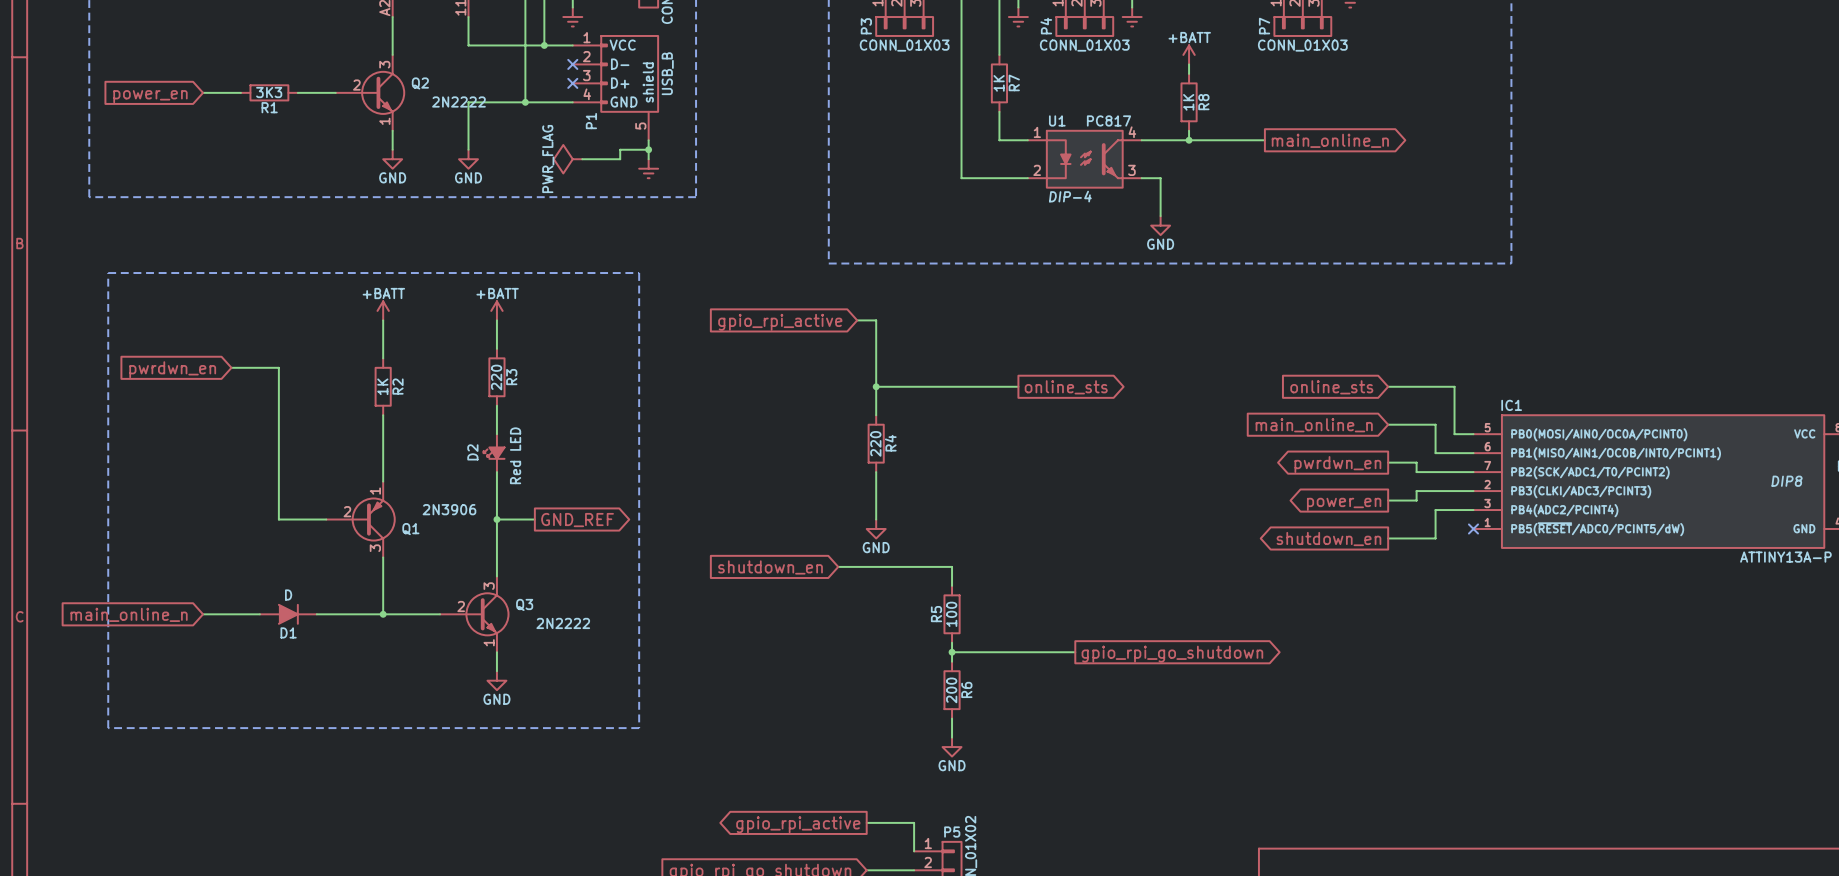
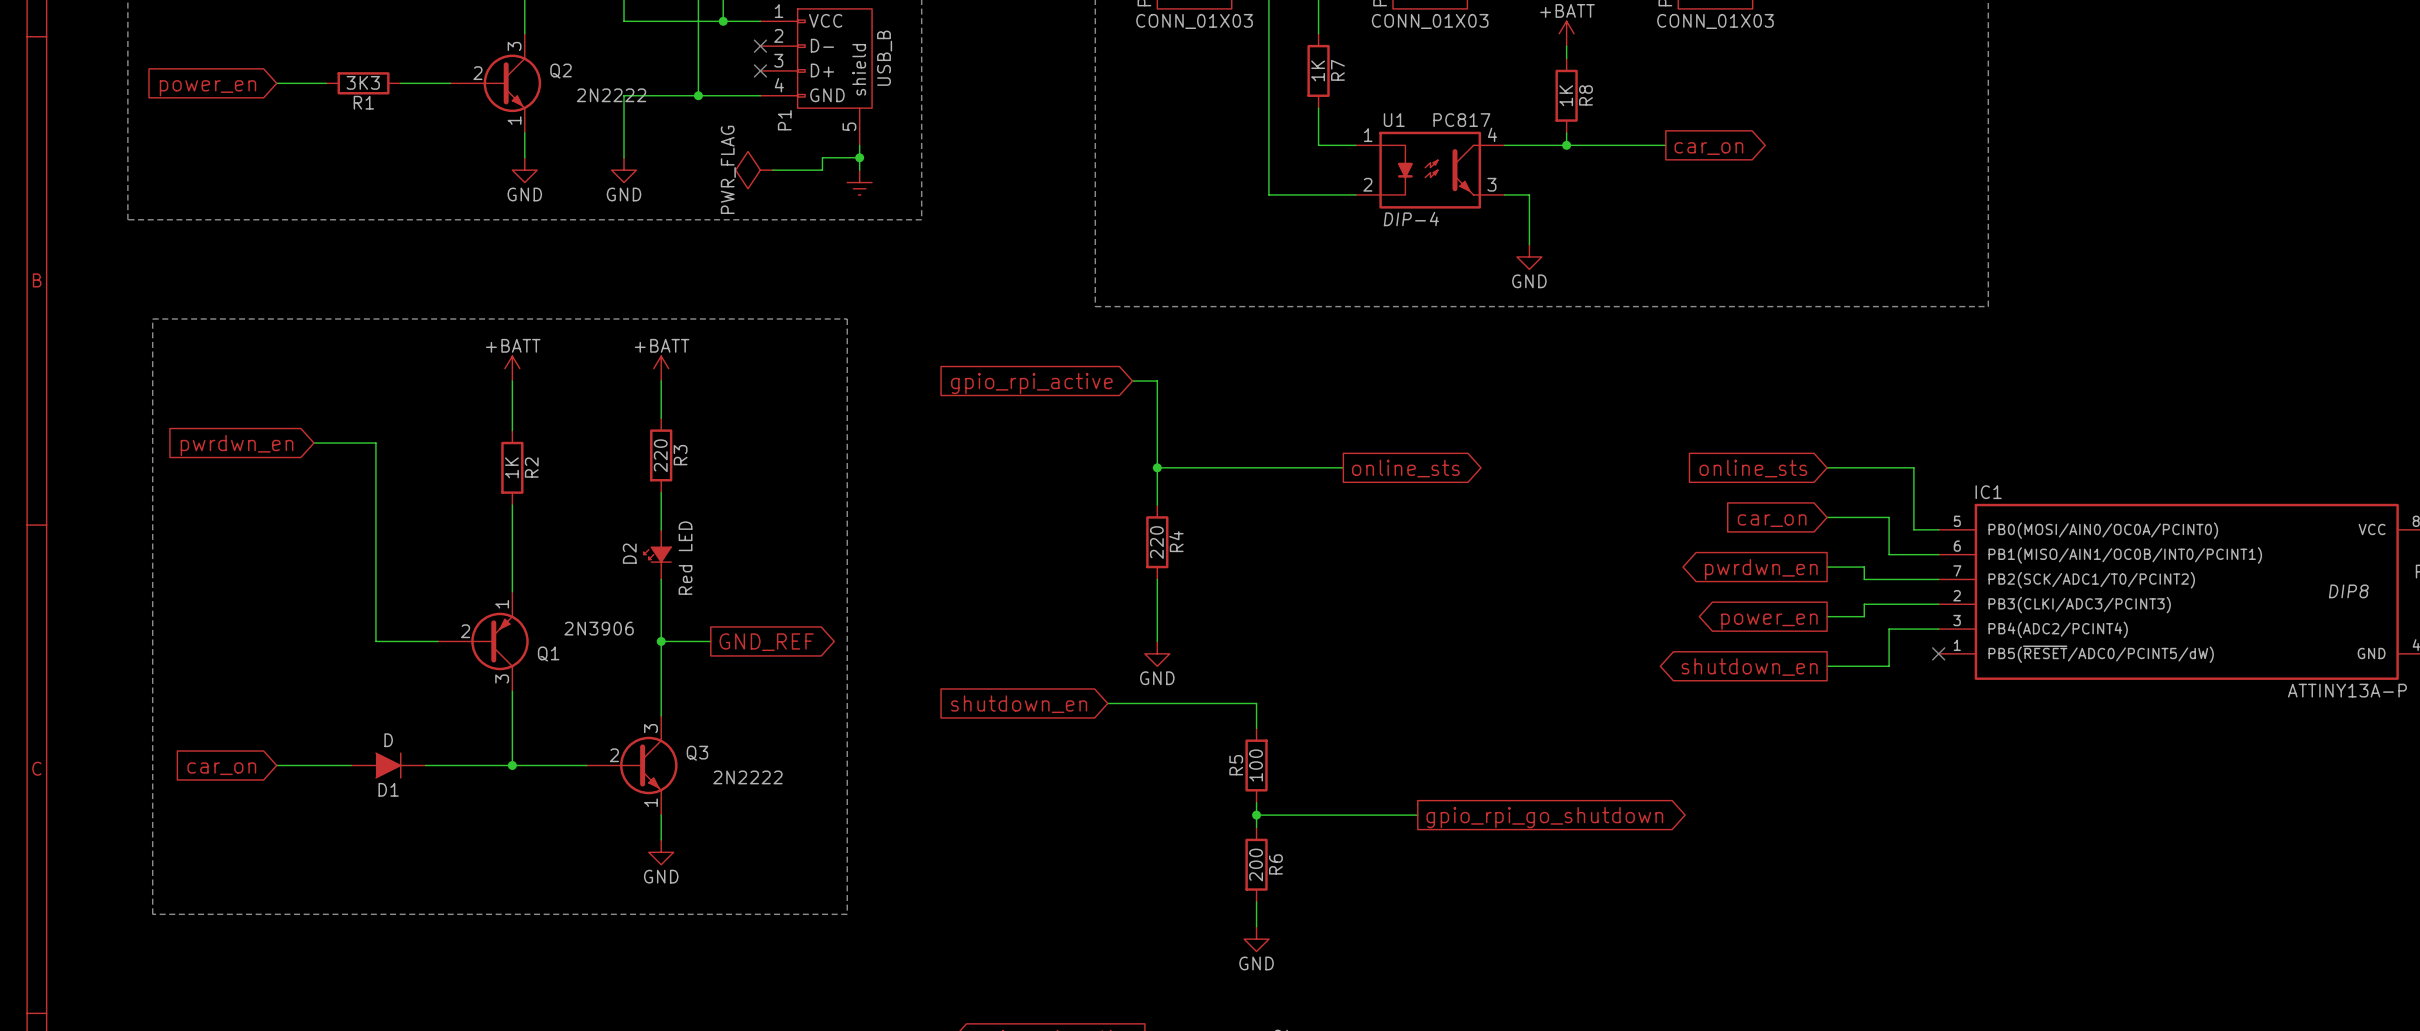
global label: main_online_n (1330, 140) -> car_on (1708, 148)
global label: main_online_n (1314, 425) -> car_on (1772, 520)
global label: main_online_n (129, 614) -> car_on (221, 768)

